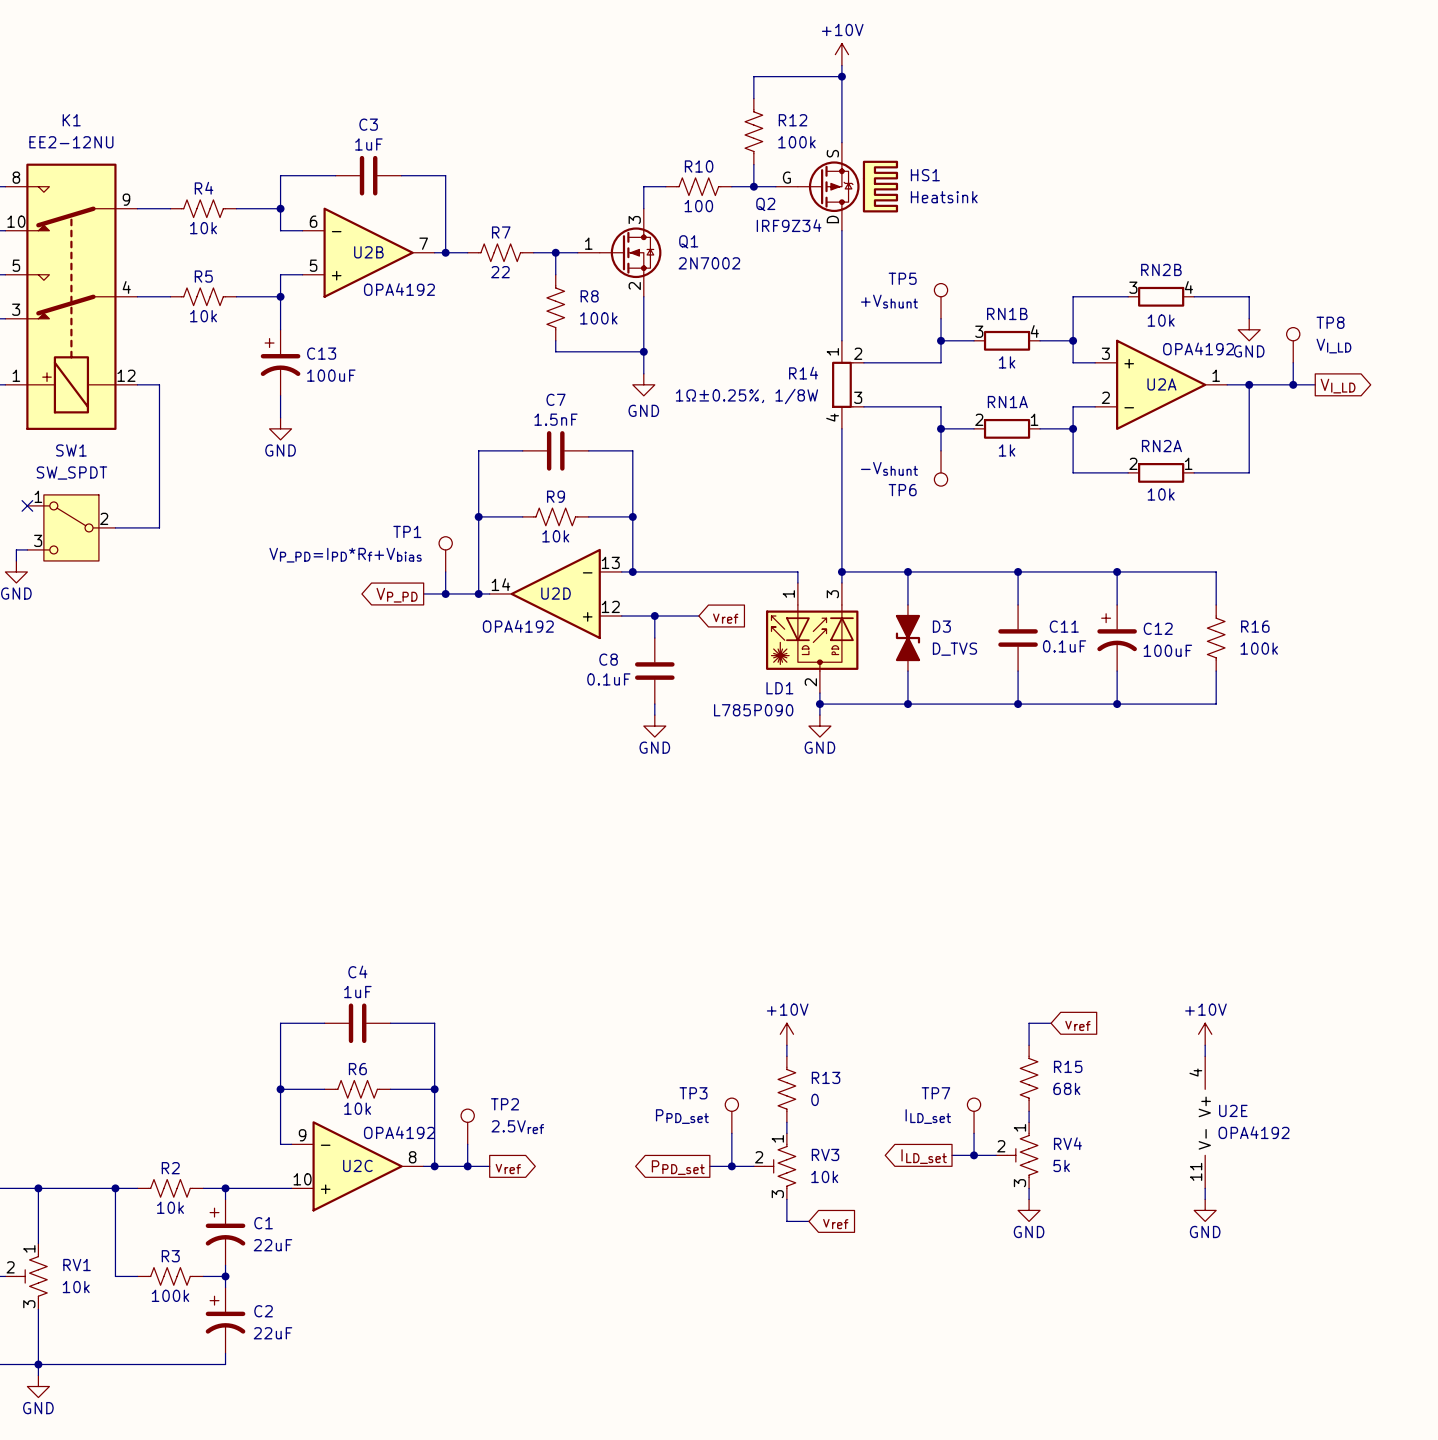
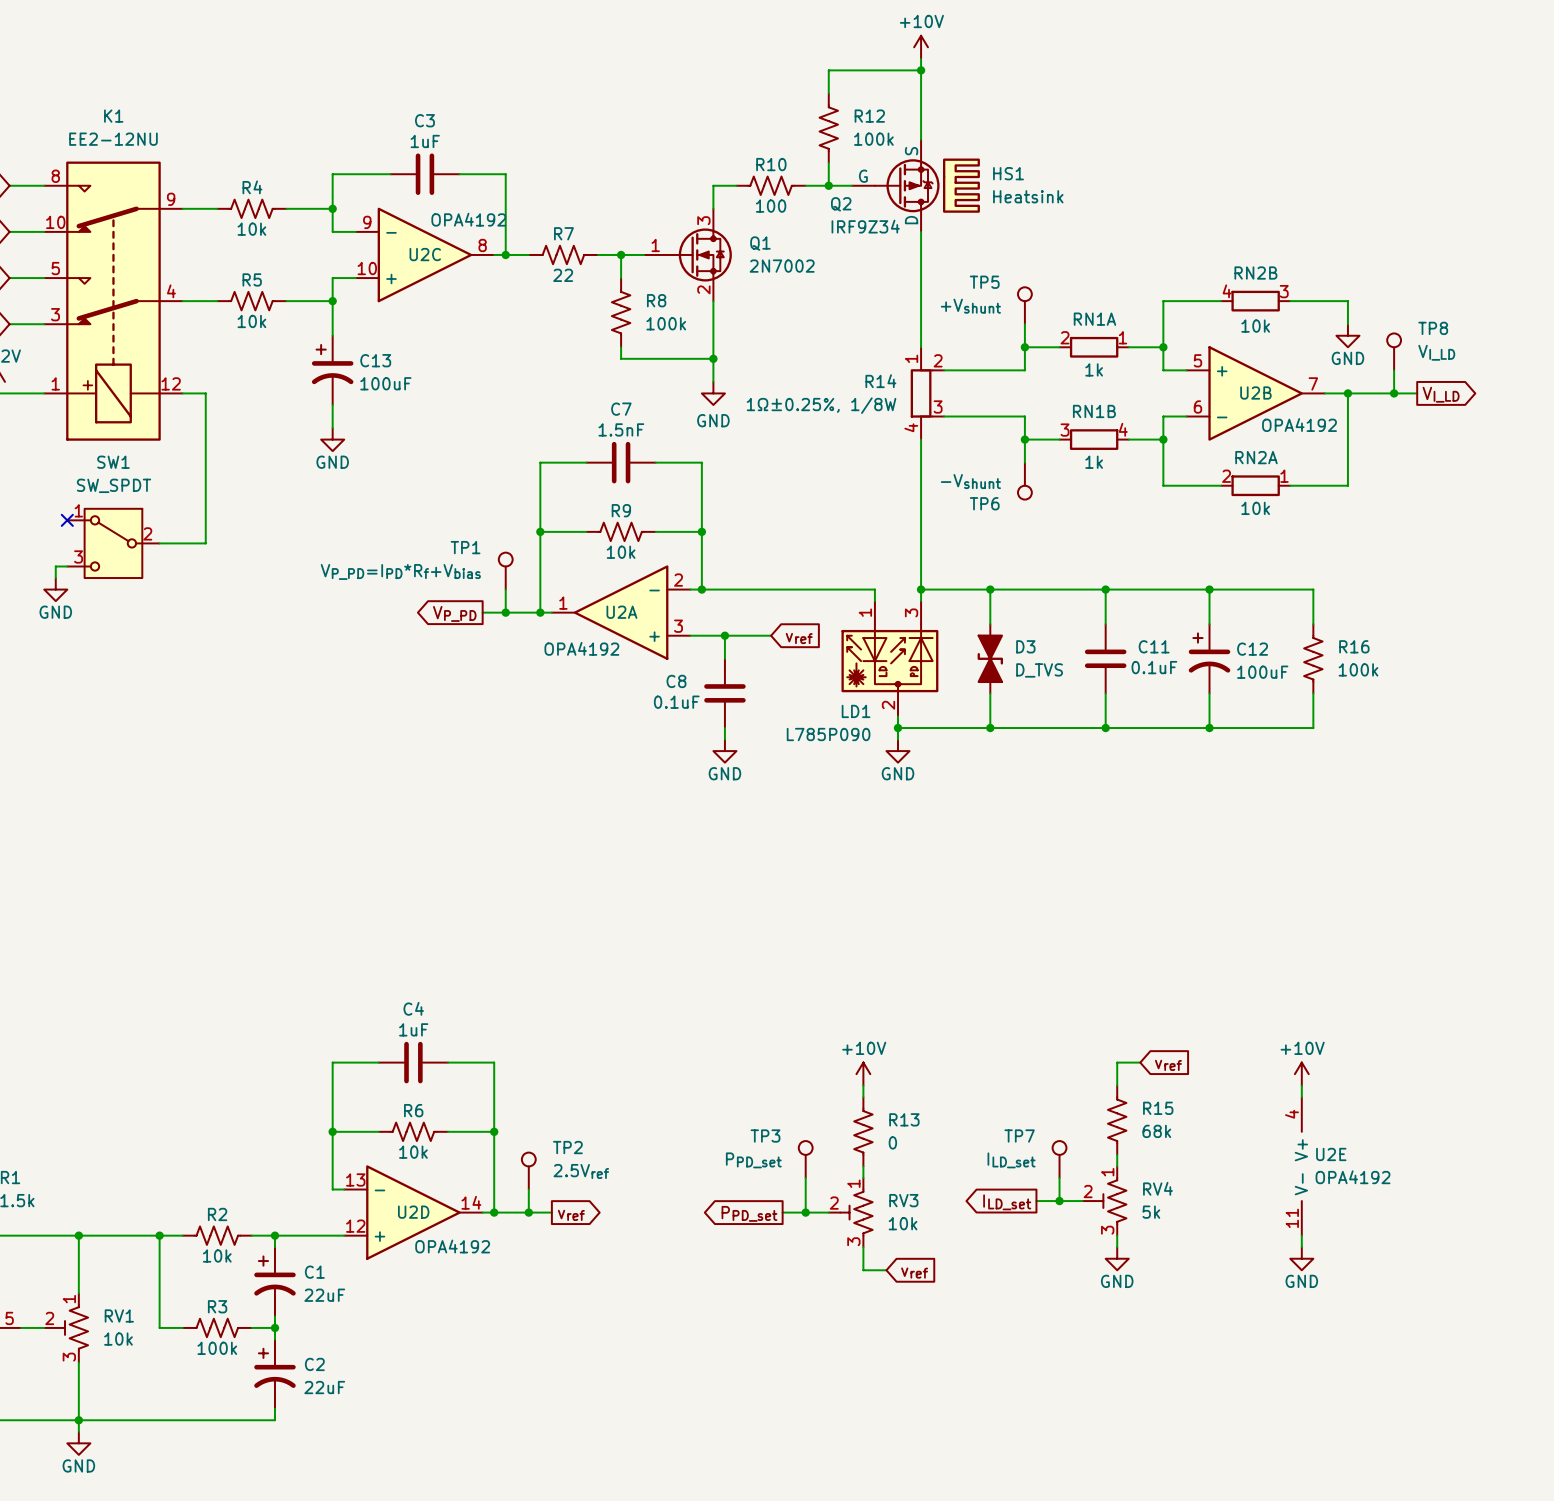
U2B flip: as is (368, 252) -> up-down (1255, 393)
U2B position: (368, 252) -> (1255, 393)
RN2B rotation: 0° (1161, 296) -> 180° (1255, 301)
RN1B position: (1007, 340) -> (1094, 439)
U2A rotation: 0° (1161, 384) -> 180° (621, 612)
U2A position: (1161, 384) -> (621, 612)
RN1A position: (1007, 428) -> (1094, 347)
U2D flip: as is (555, 593) -> left-right (413, 1212)
U2D position: (555, 593) -> (413, 1212)
U2C position: (357, 1166) -> (424, 254)

